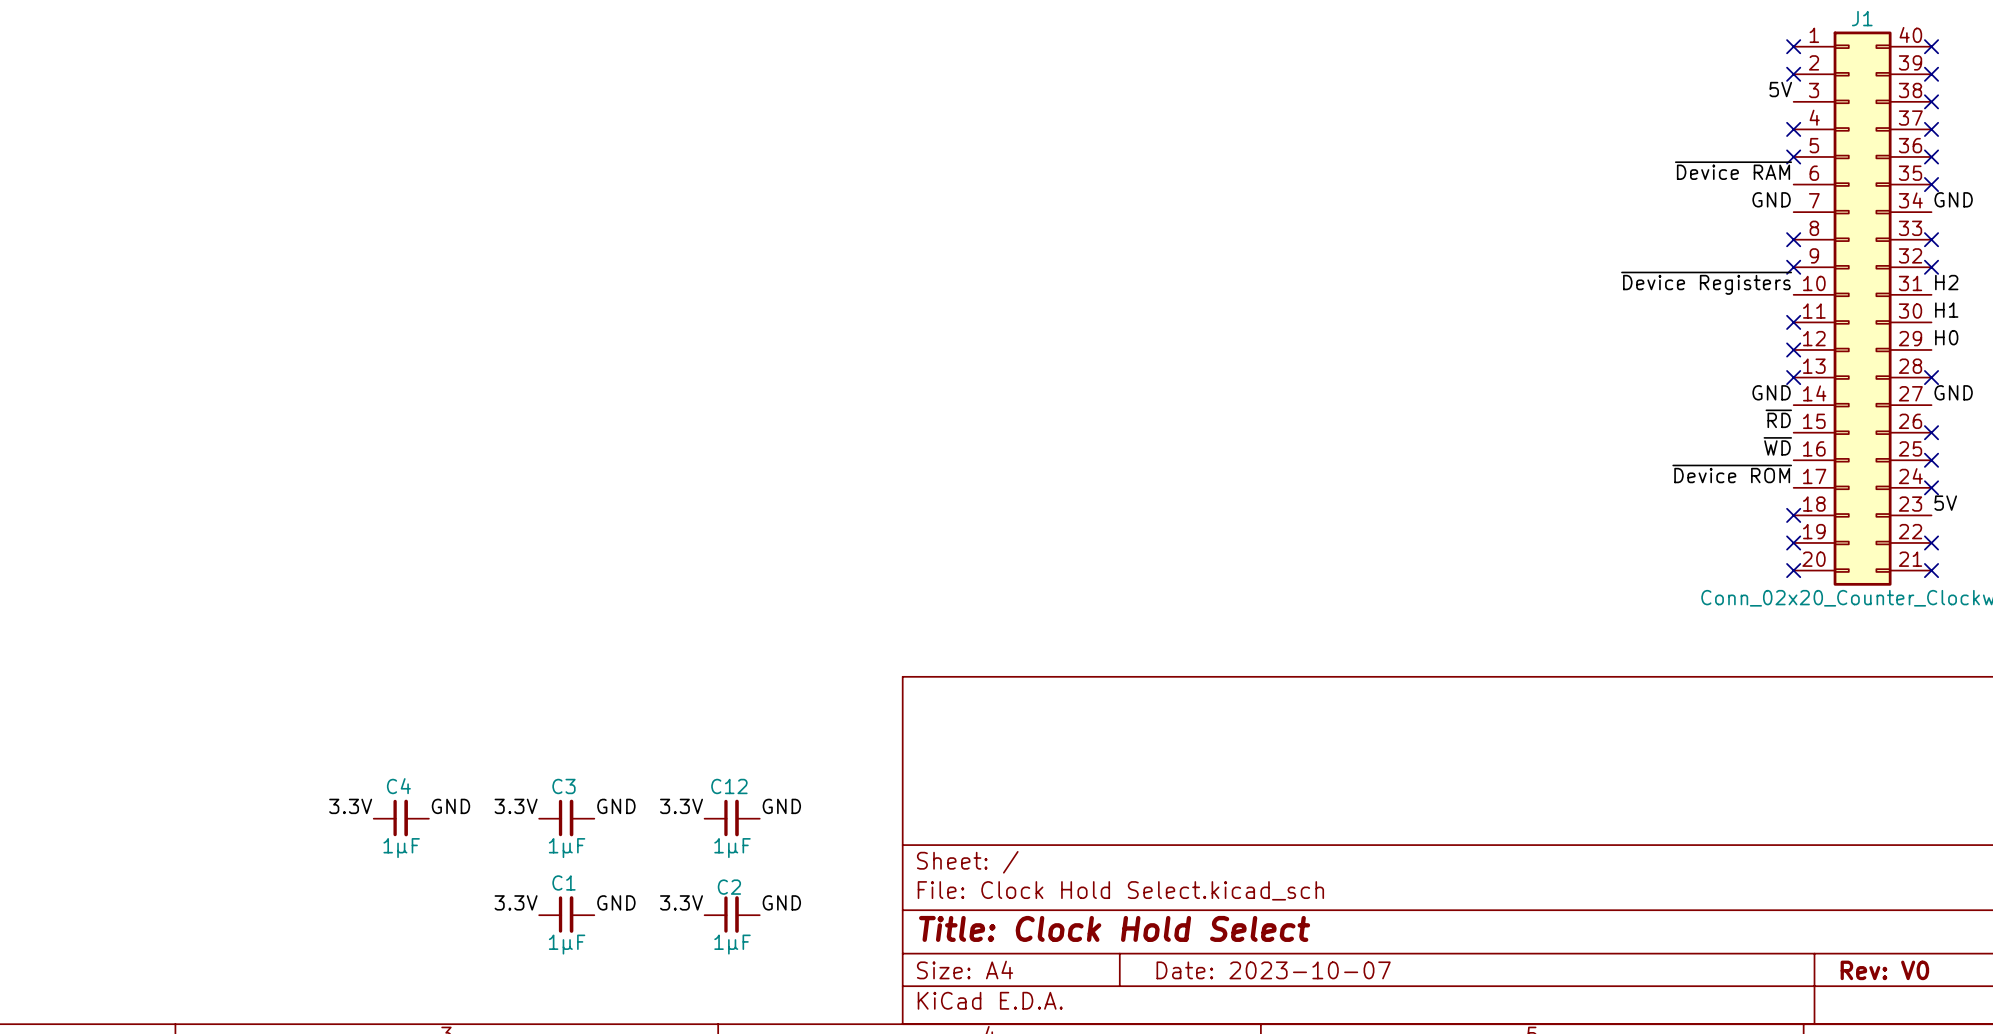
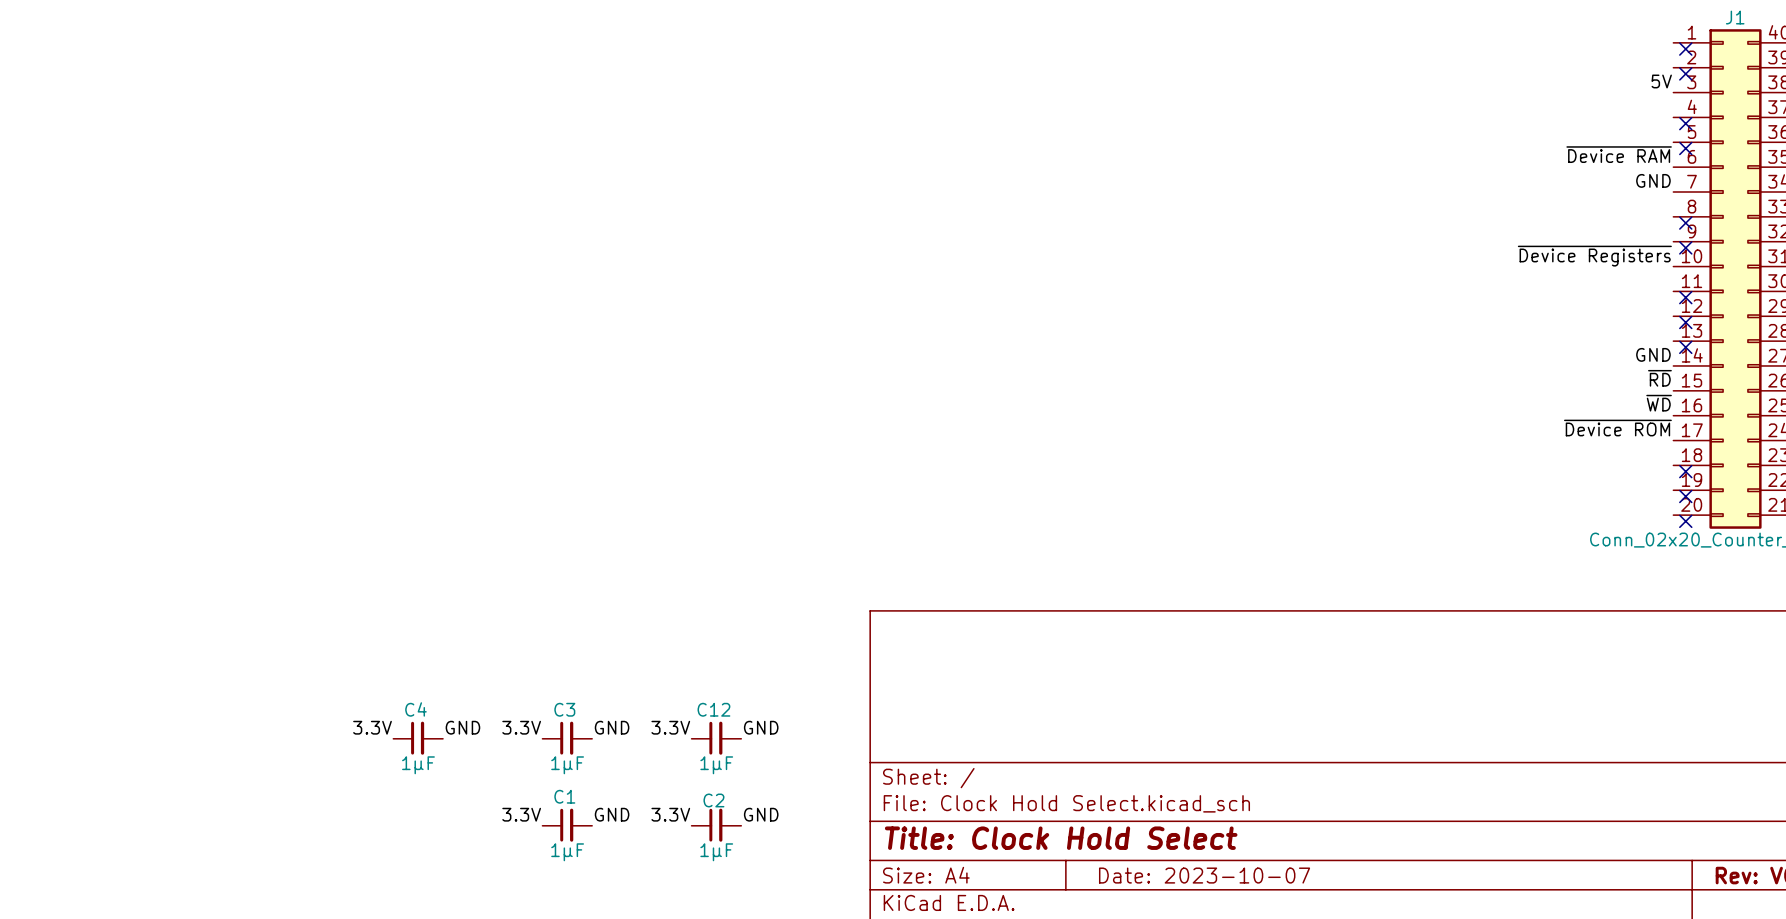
no-connect mark: (1793, 46) -> none
no-connect mark: none -> (1685, 49)
no-connect mark: (1793, 74) -> none
no-connect mark: none -> (1685, 73)
no-connect mark: (1793, 129) -> none
no-connect mark: none -> (1685, 123)
no-connect mark: (1793, 156) -> none
no-connect mark: none -> (1685, 148)
no-connect mark: (1793, 239) -> none
no-connect mark: none -> (1685, 223)
no-connect mark: (1793, 267) -> none
no-connect mark: none -> (1685, 247)
no-connect mark: (1793, 322) -> none
no-connect mark: none -> (1685, 297)
no-connect mark: (1793, 349) -> none
no-connect mark: none -> (1685, 322)
no-connect mark: (1793, 377) -> none
no-connect mark: none -> (1685, 347)
no-connect mark: (1793, 515) -> none
no-connect mark: none -> (1685, 471)
no-connect mark: (1793, 542) -> none
no-connect mark: none -> (1685, 496)
no-connect mark: (1793, 570) -> none
no-connect mark: none -> (1685, 521)

